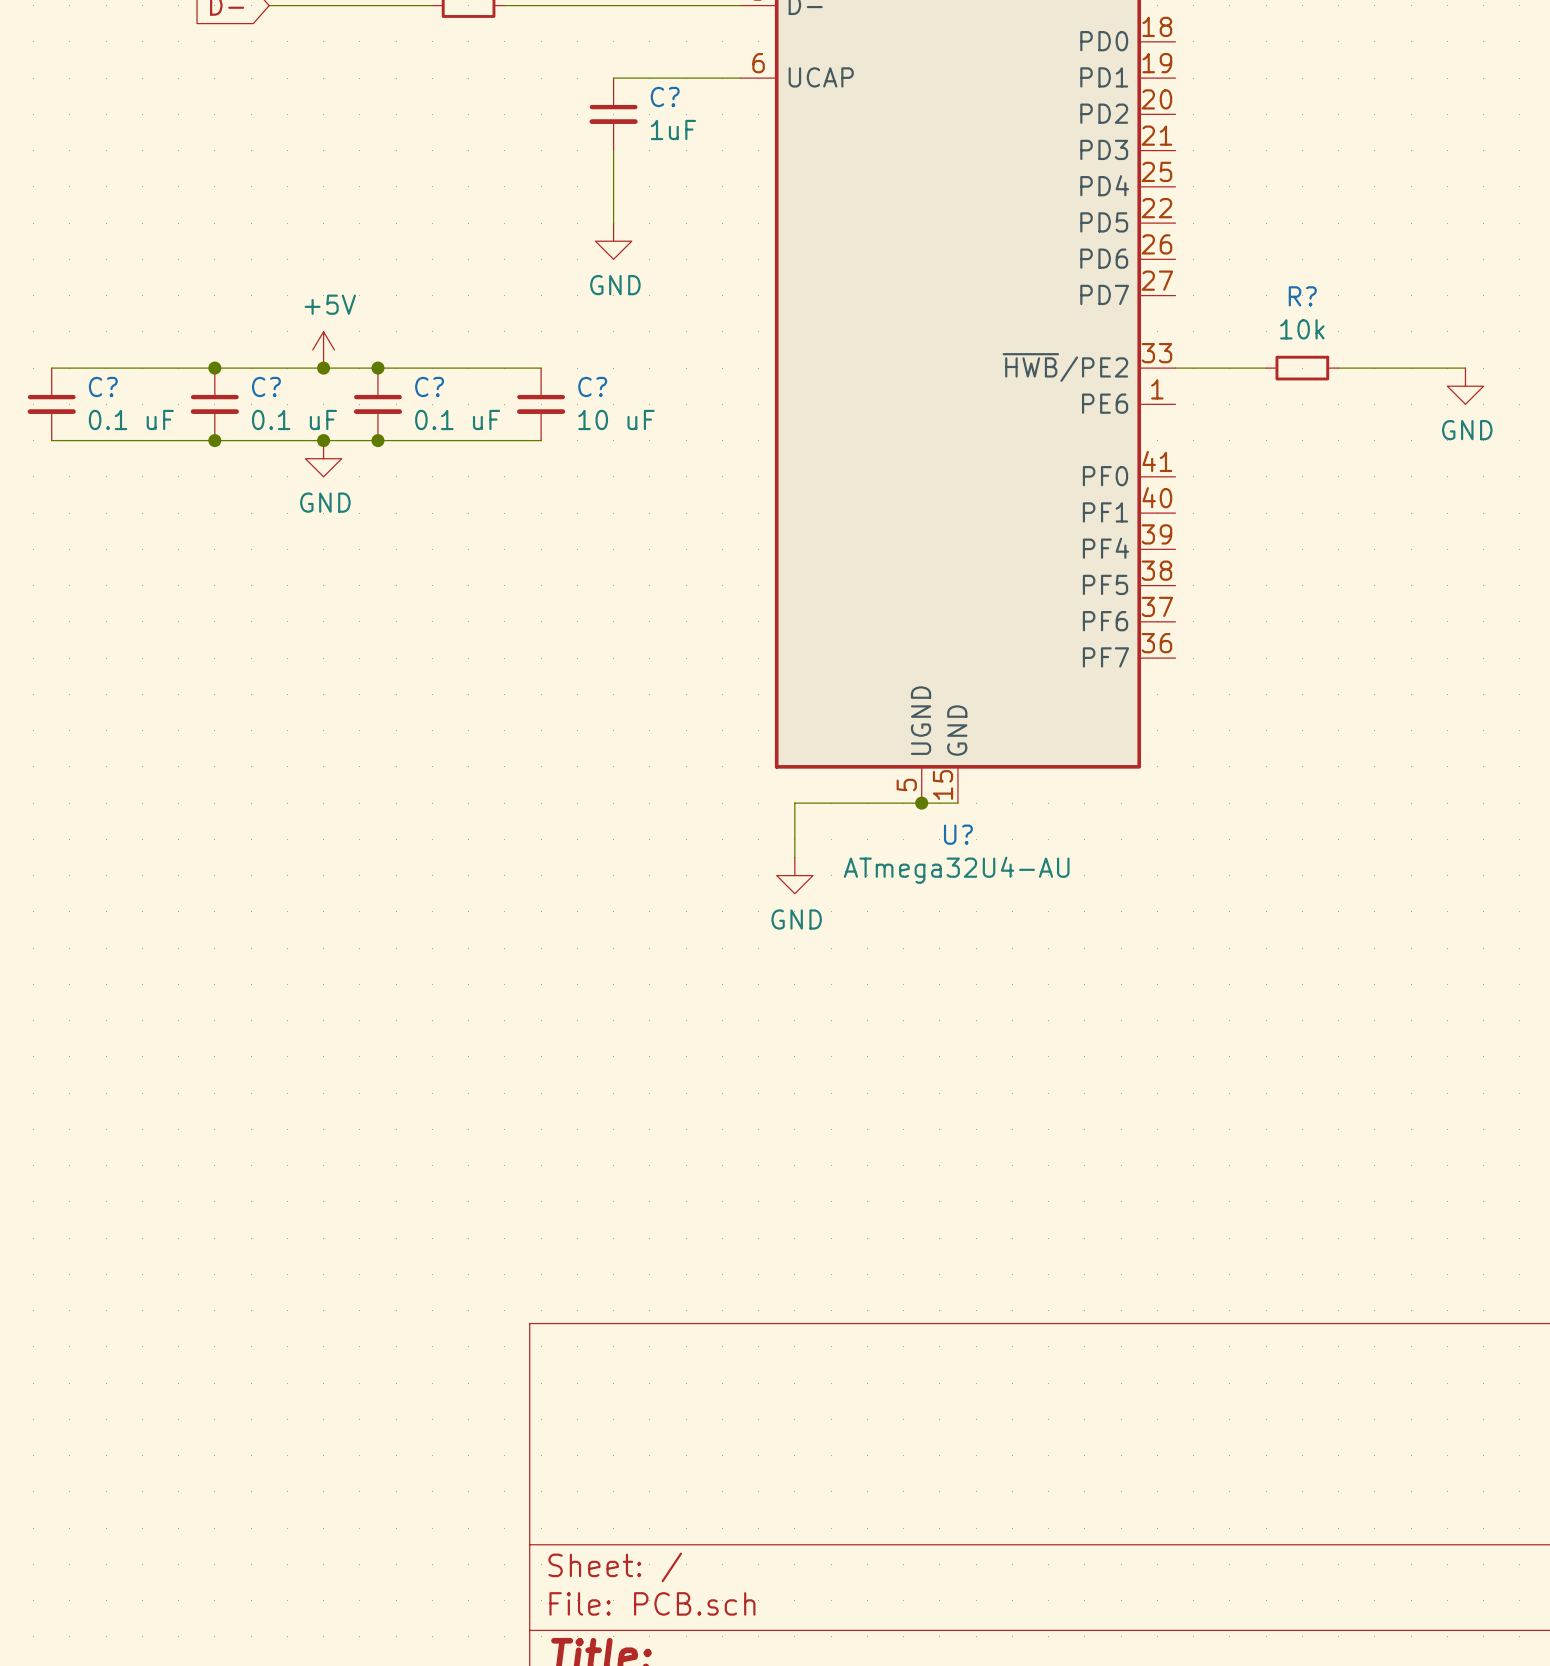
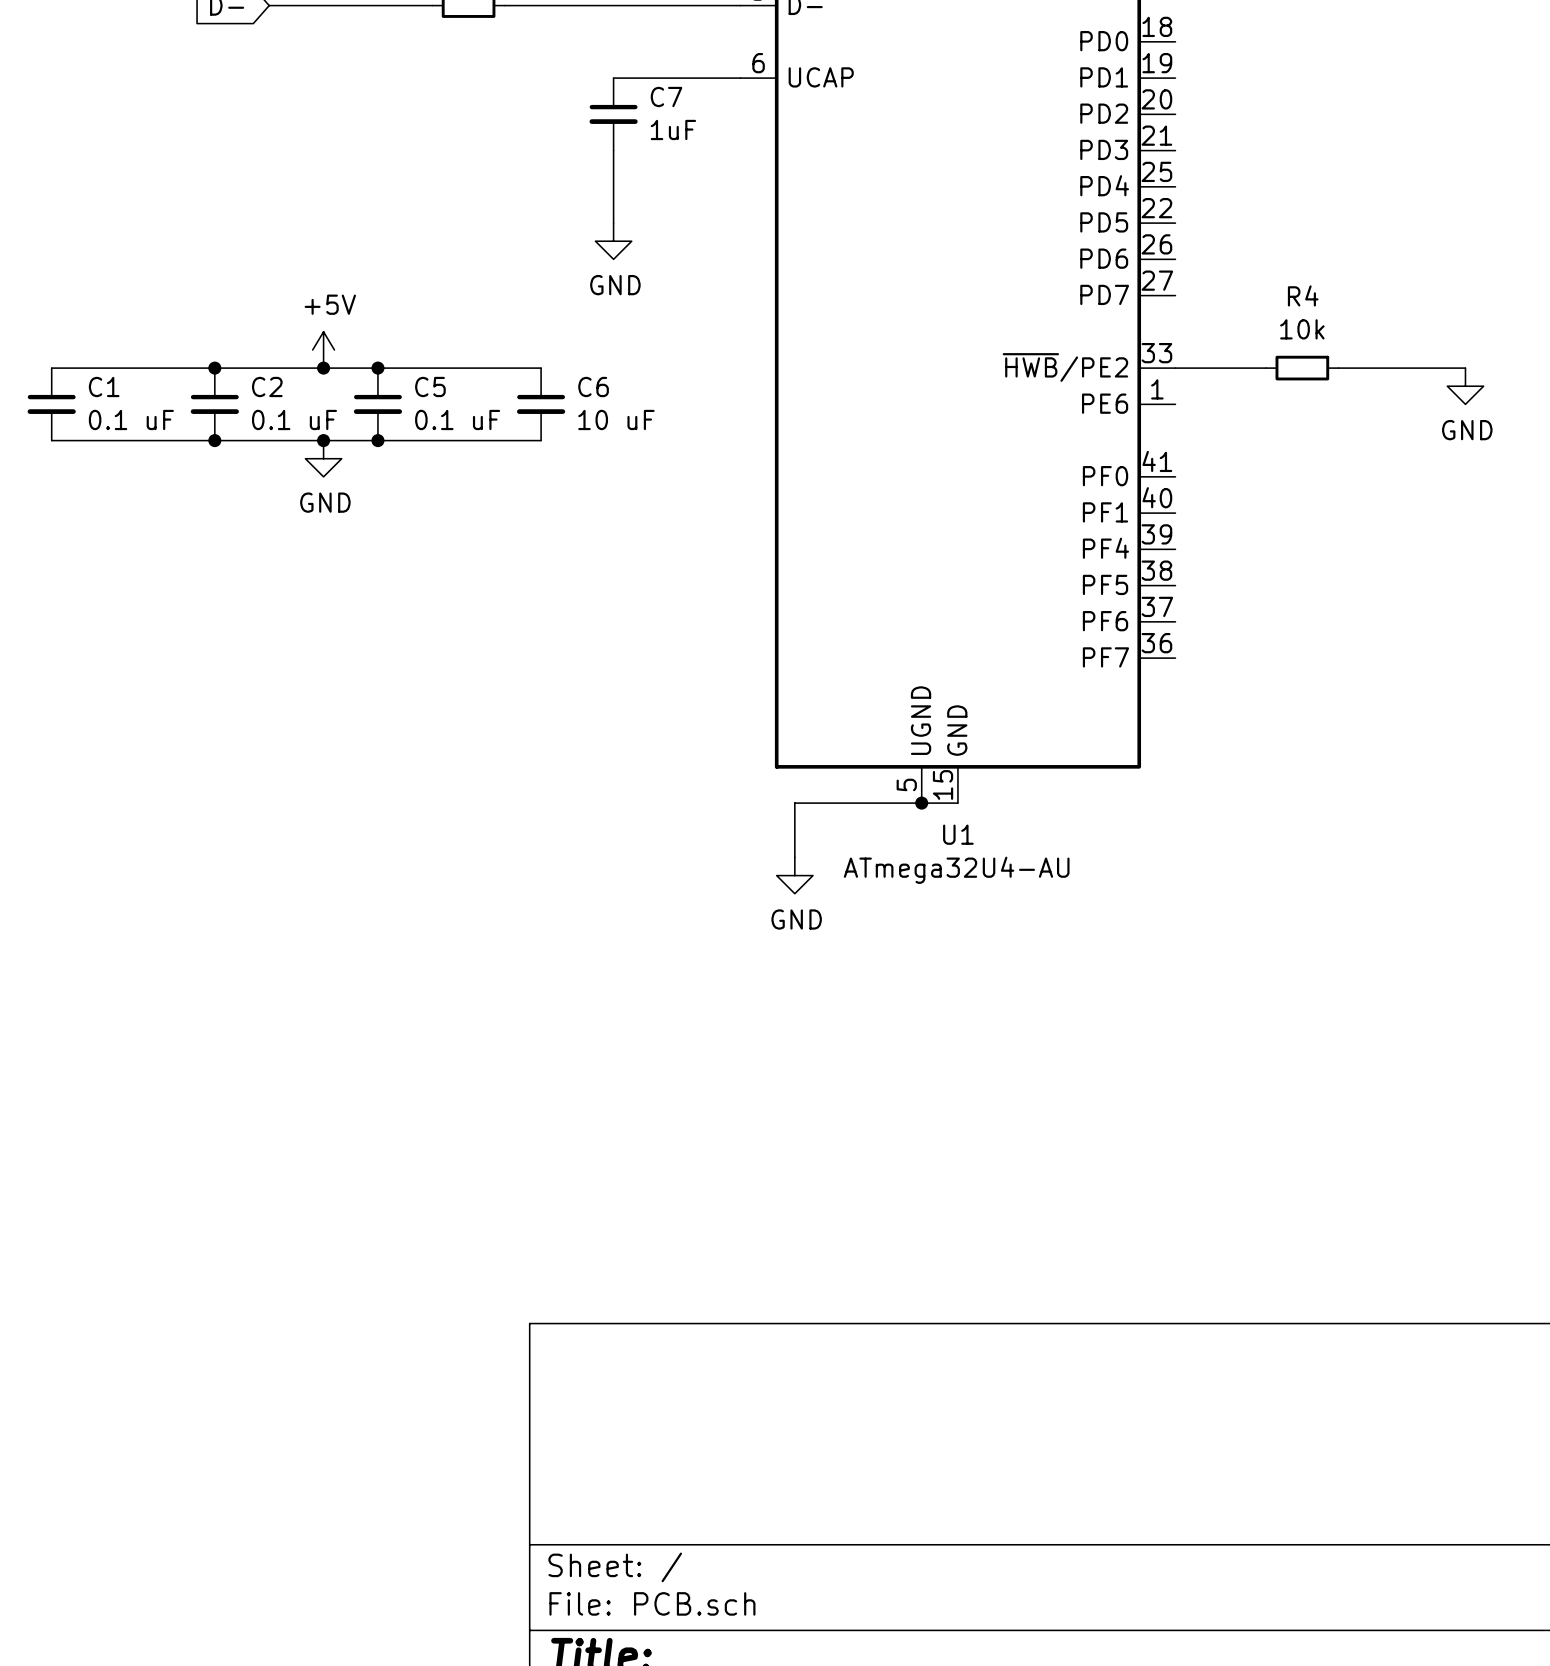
C? name: C? (665, 96) -> C7 (666, 96)
R? name: R? (1302, 296) -> R4 (1303, 295)
C? name: C? (103, 386) -> C1 (104, 386)
C? name: C? (266, 386) -> C2 (267, 386)
C? name: C? (429, 386) -> C5 (430, 386)
C? name: C? (592, 386) -> C6 (593, 386)
U? name: U? (958, 834) -> U1 (958, 834)

